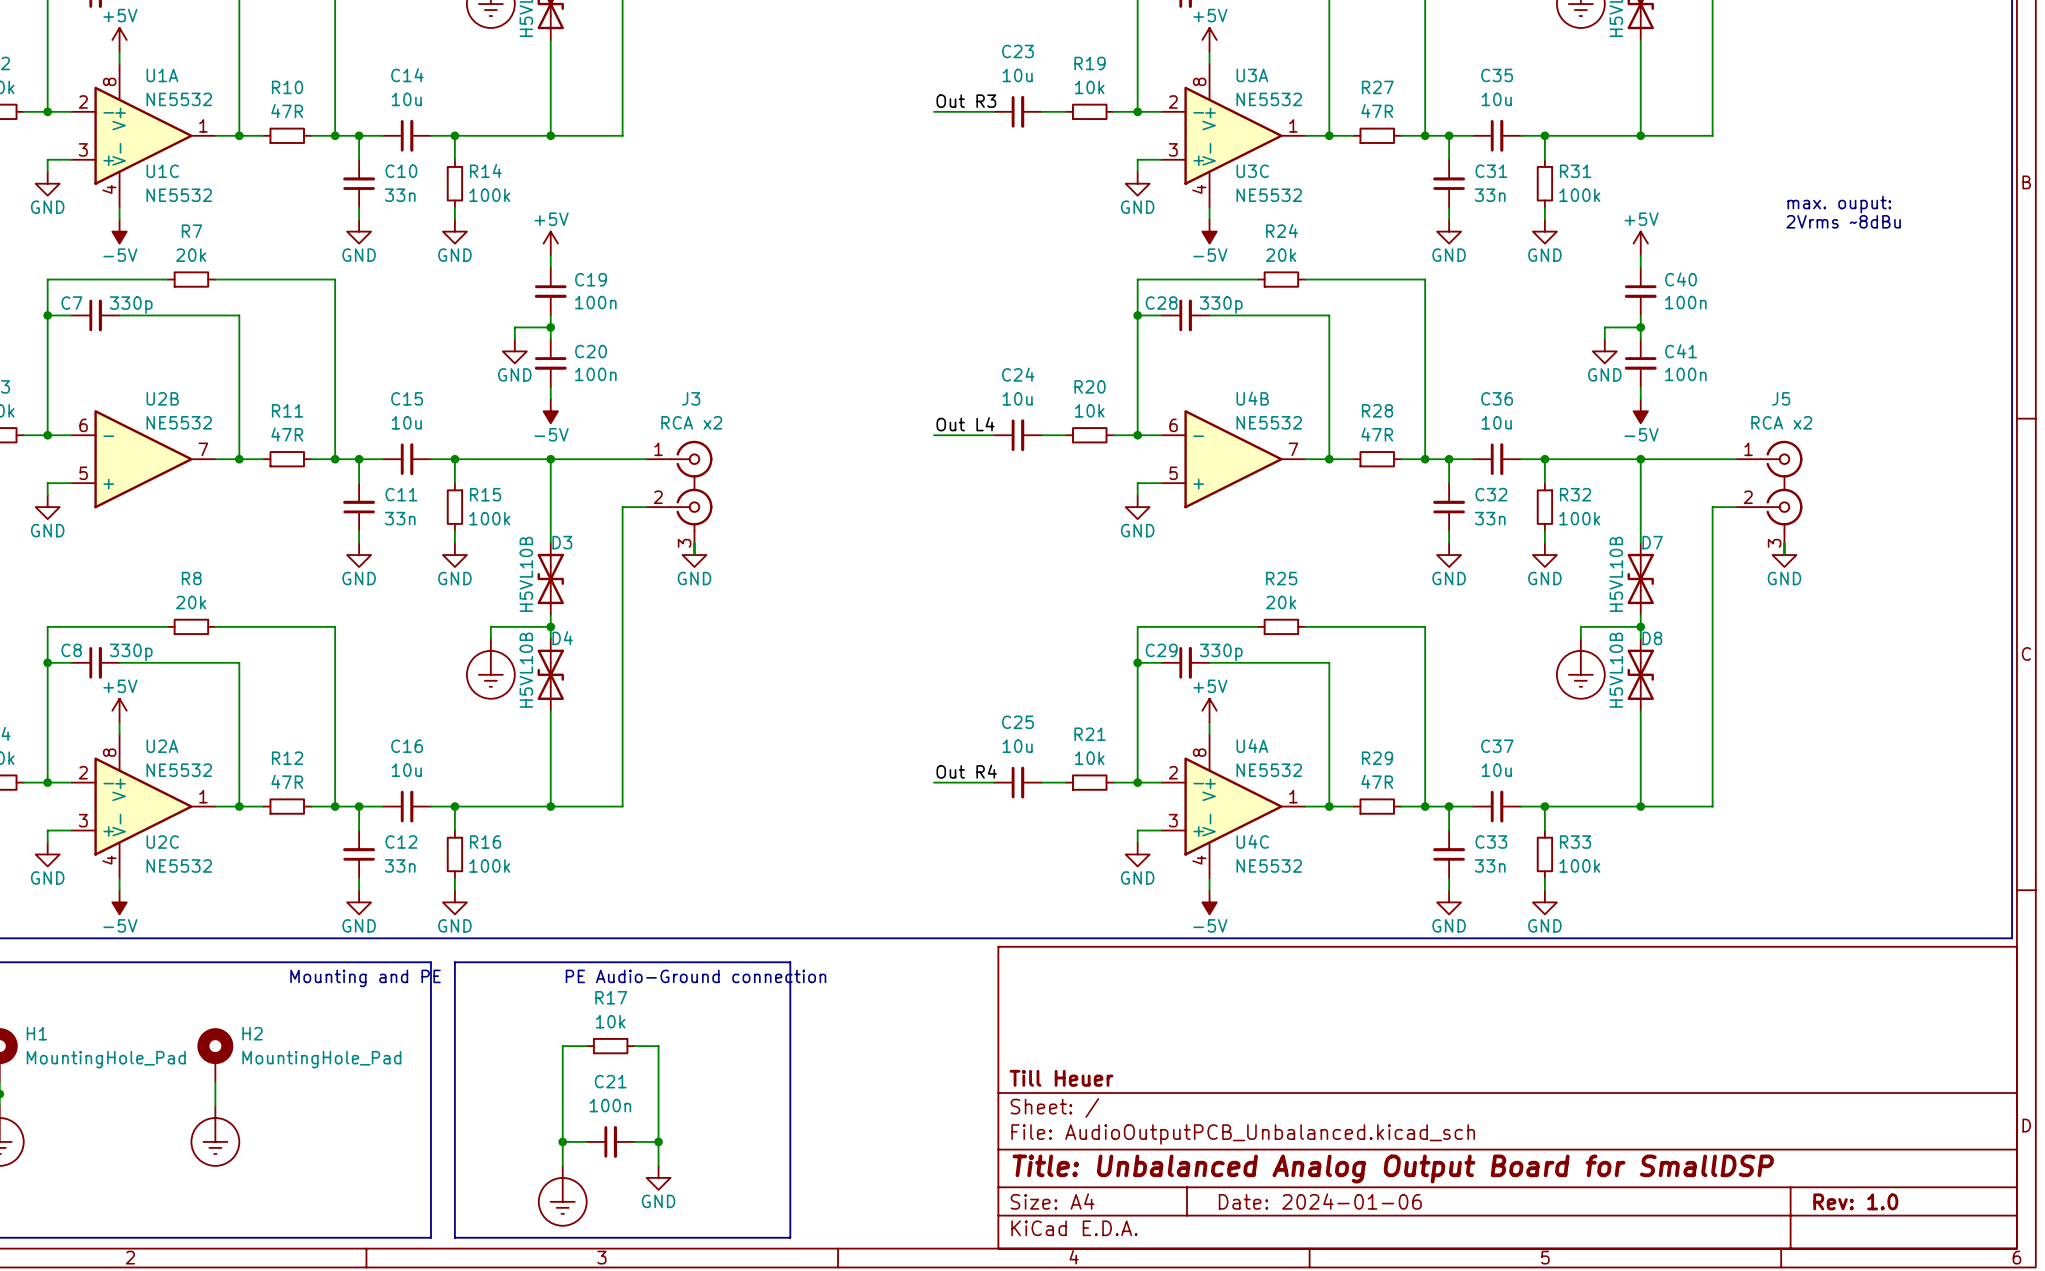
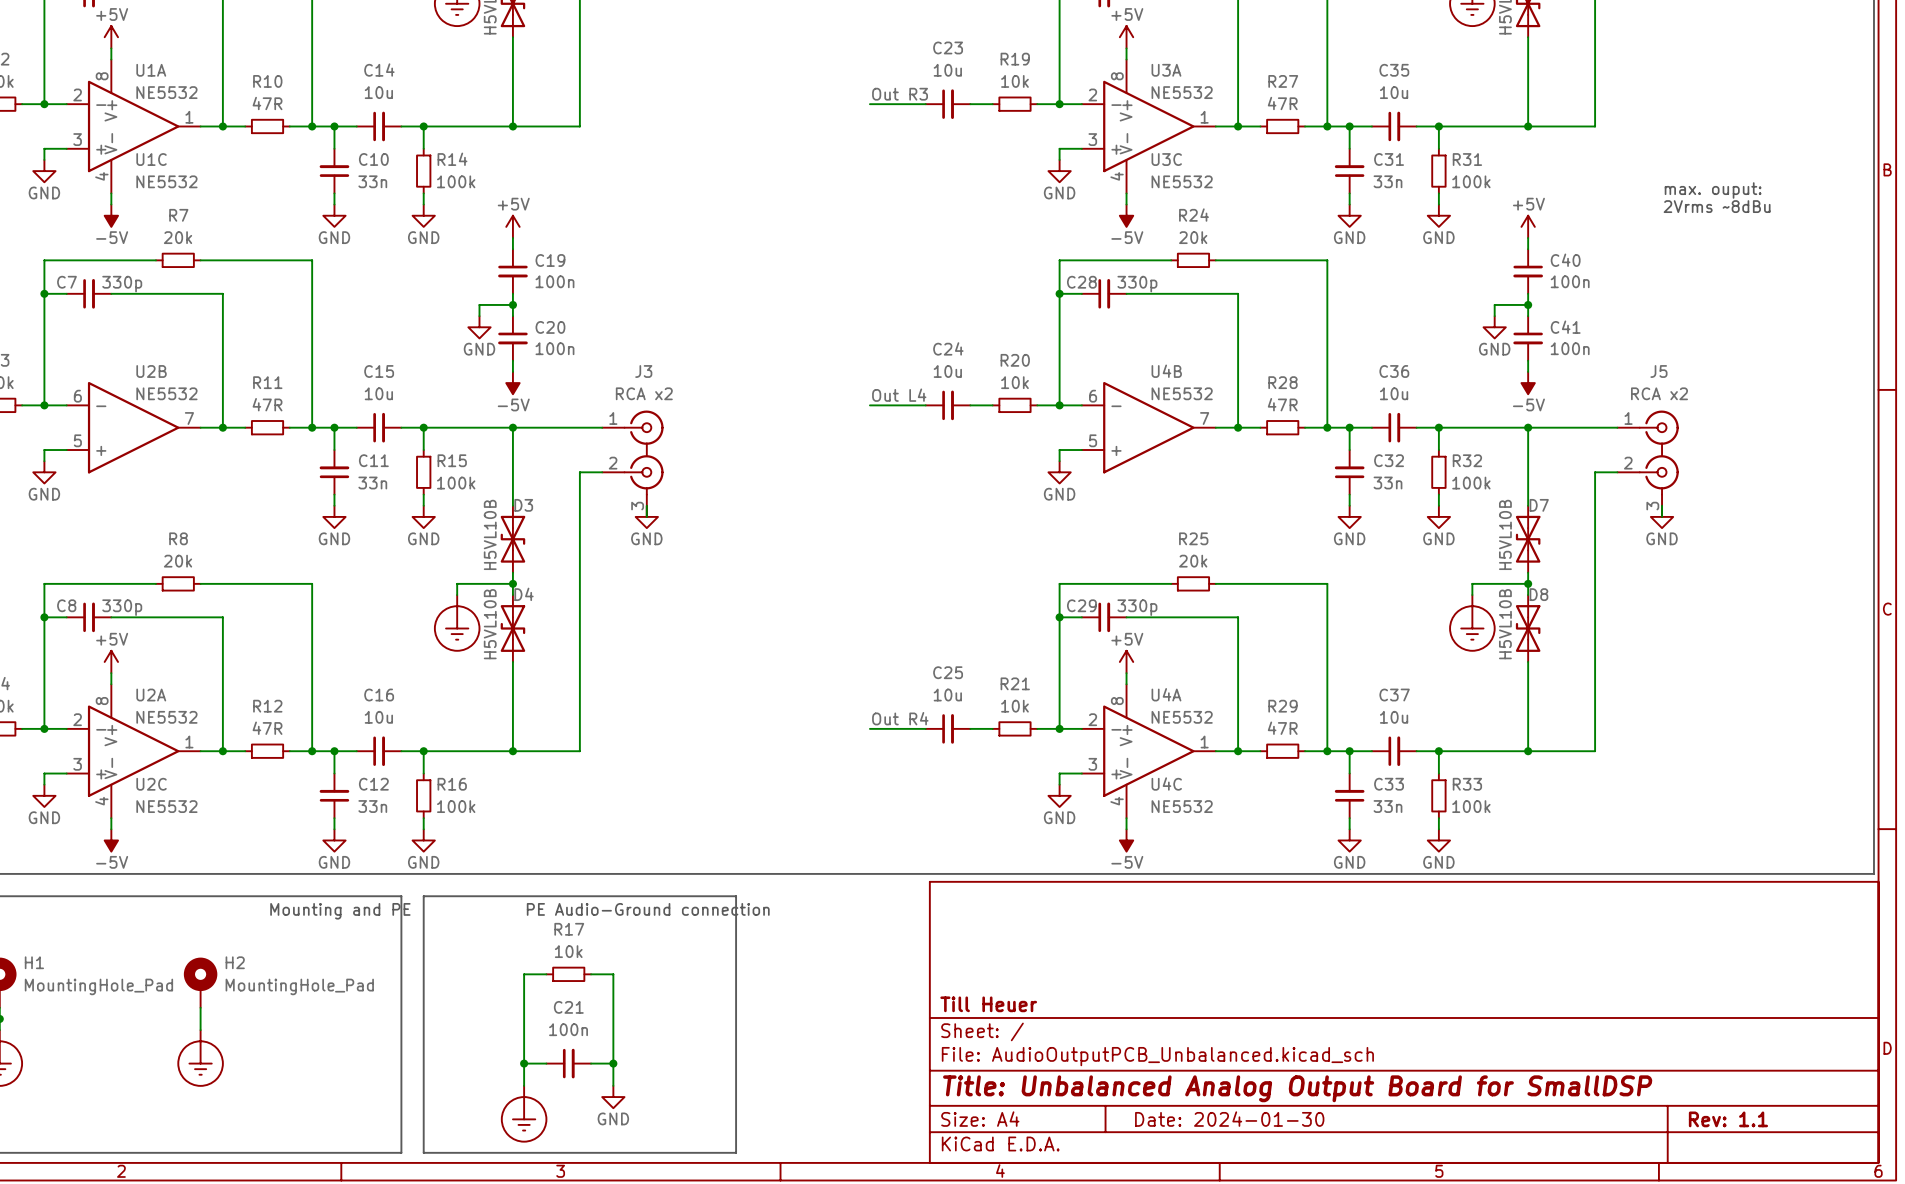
title block: Date: 2024-01-06 (1320, 1201) -> Date: 2024-01-30 (1229, 1119)
title block: Rev: 1.0 (1855, 1201) -> Rev: 1.1 (1728, 1119)

